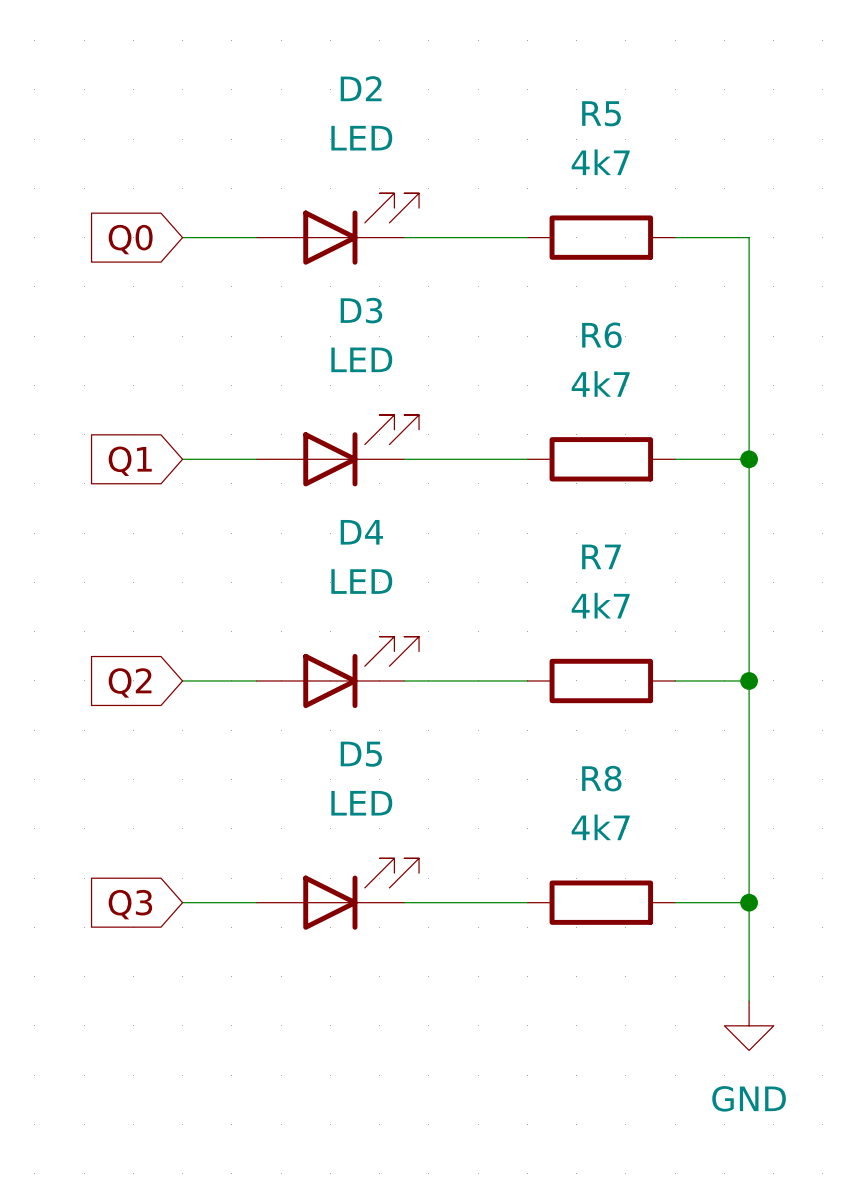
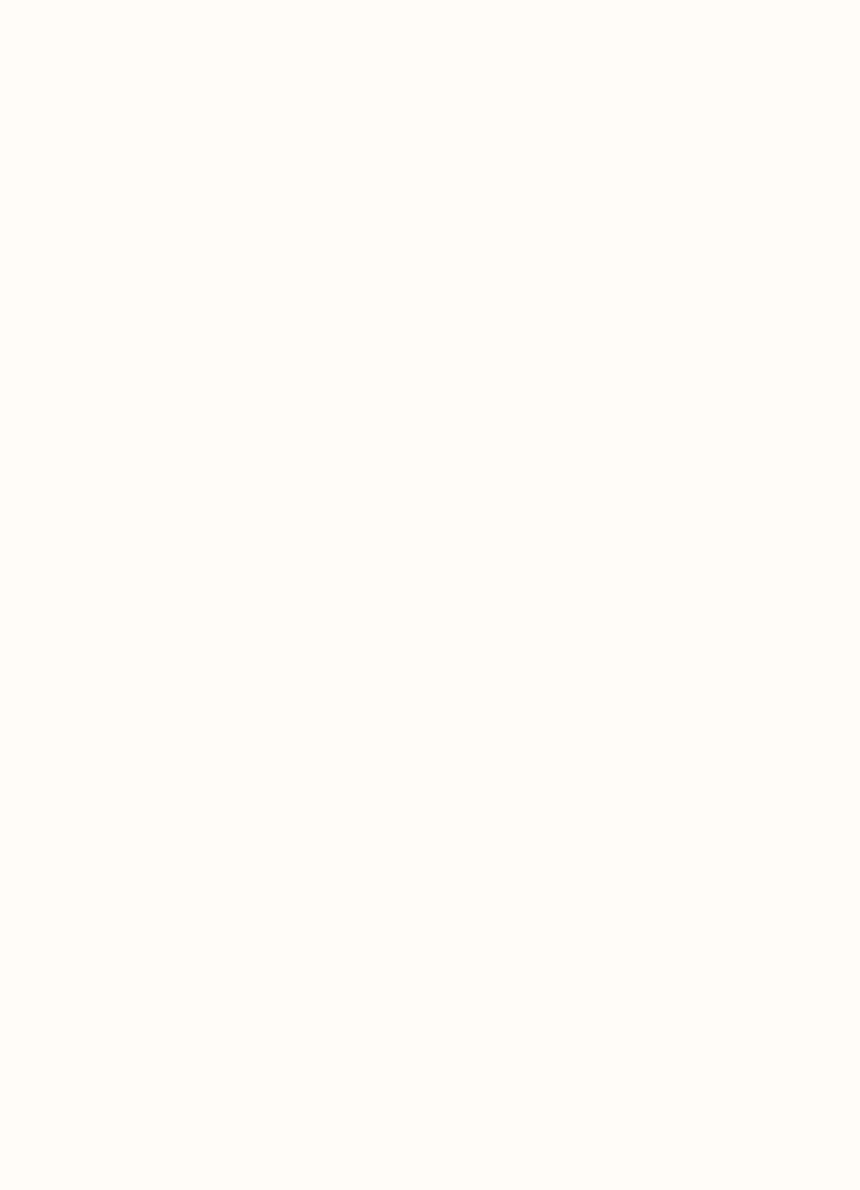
D2: LED (337, 229) -> none
wire: (182, 237) (256, 237) -> none
wire: (404, 237) (527, 237) -> none
R5: 4k7 (601, 237) -> none
wire: (675, 237) (749, 237) (749, 1001) -> none
global label: Q0 (130, 239) -> none
D3: LED (337, 450) -> none
wire: (182, 459) (256, 459) -> none
wire: (404, 459) (527, 459) -> none
R6: 4k7 (601, 459) -> none
wire: (675, 459) (749, 459) -> none
junction: (749, 459) -> none
global label: Q1 (130, 461) -> none
D4: LED (337, 672) -> none
wire: (182, 680) (256, 680) -> none
wire: (404, 680) (527, 680) -> none
R7: 4k7 (601, 680) -> none
wire: (675, 680) (749, 680) -> none
junction: (749, 680) -> none
global label: Q2 (130, 682) -> none
D5: LED (337, 894) -> none
wire: (182, 902) (256, 902) -> none
wire: (404, 902) (527, 902) -> none
R8: 4k7 (601, 902) -> none
wire: (675, 902) (749, 902) -> none
junction: (749, 902) -> none
global label: Q3 (130, 904) -> none
power symbol: GND (749, 1025) -> none

